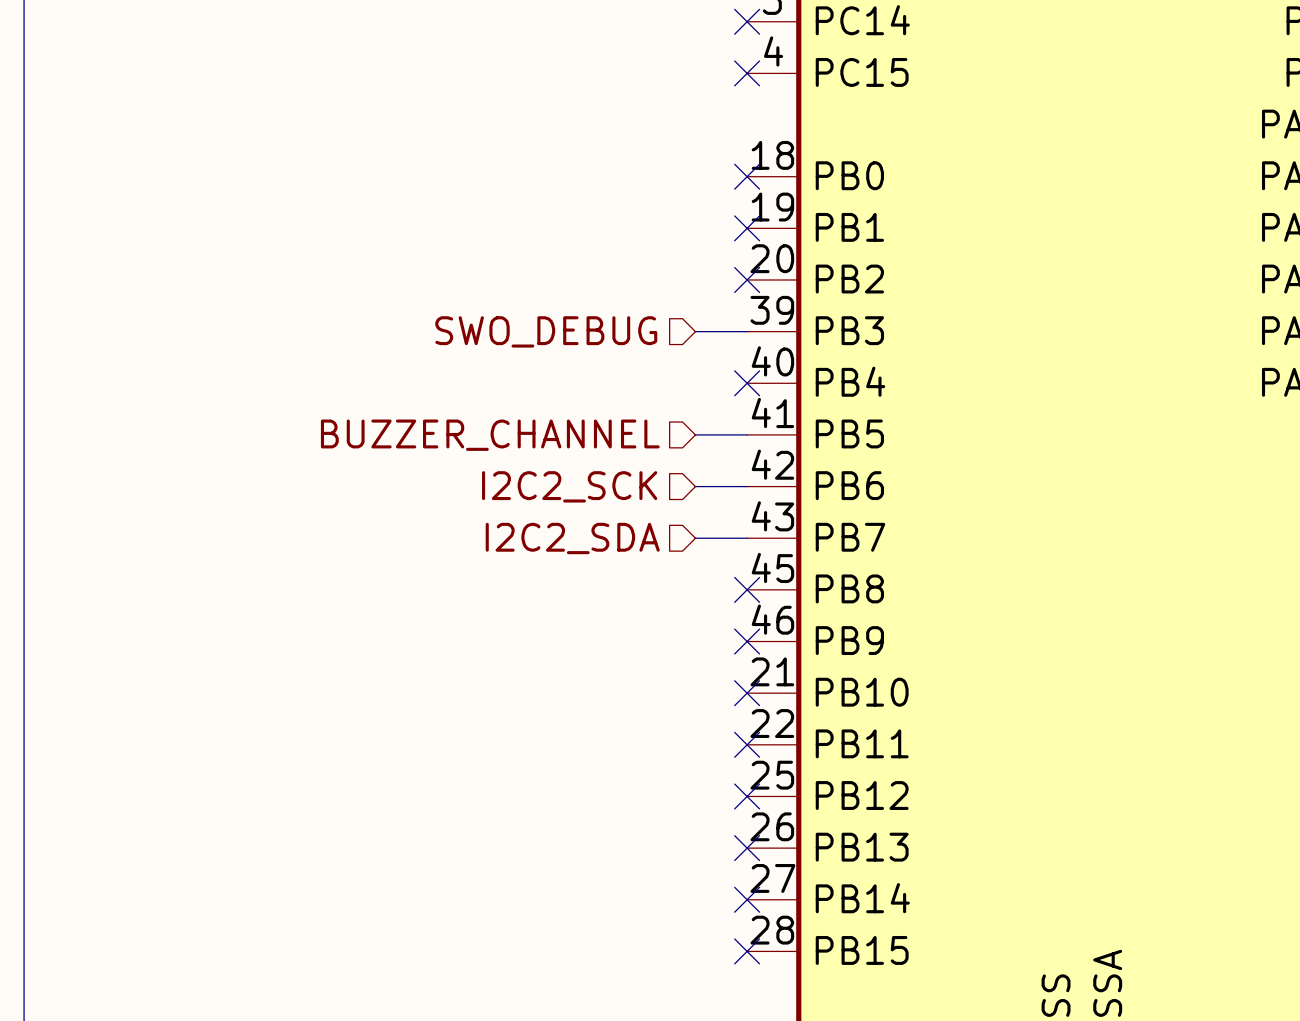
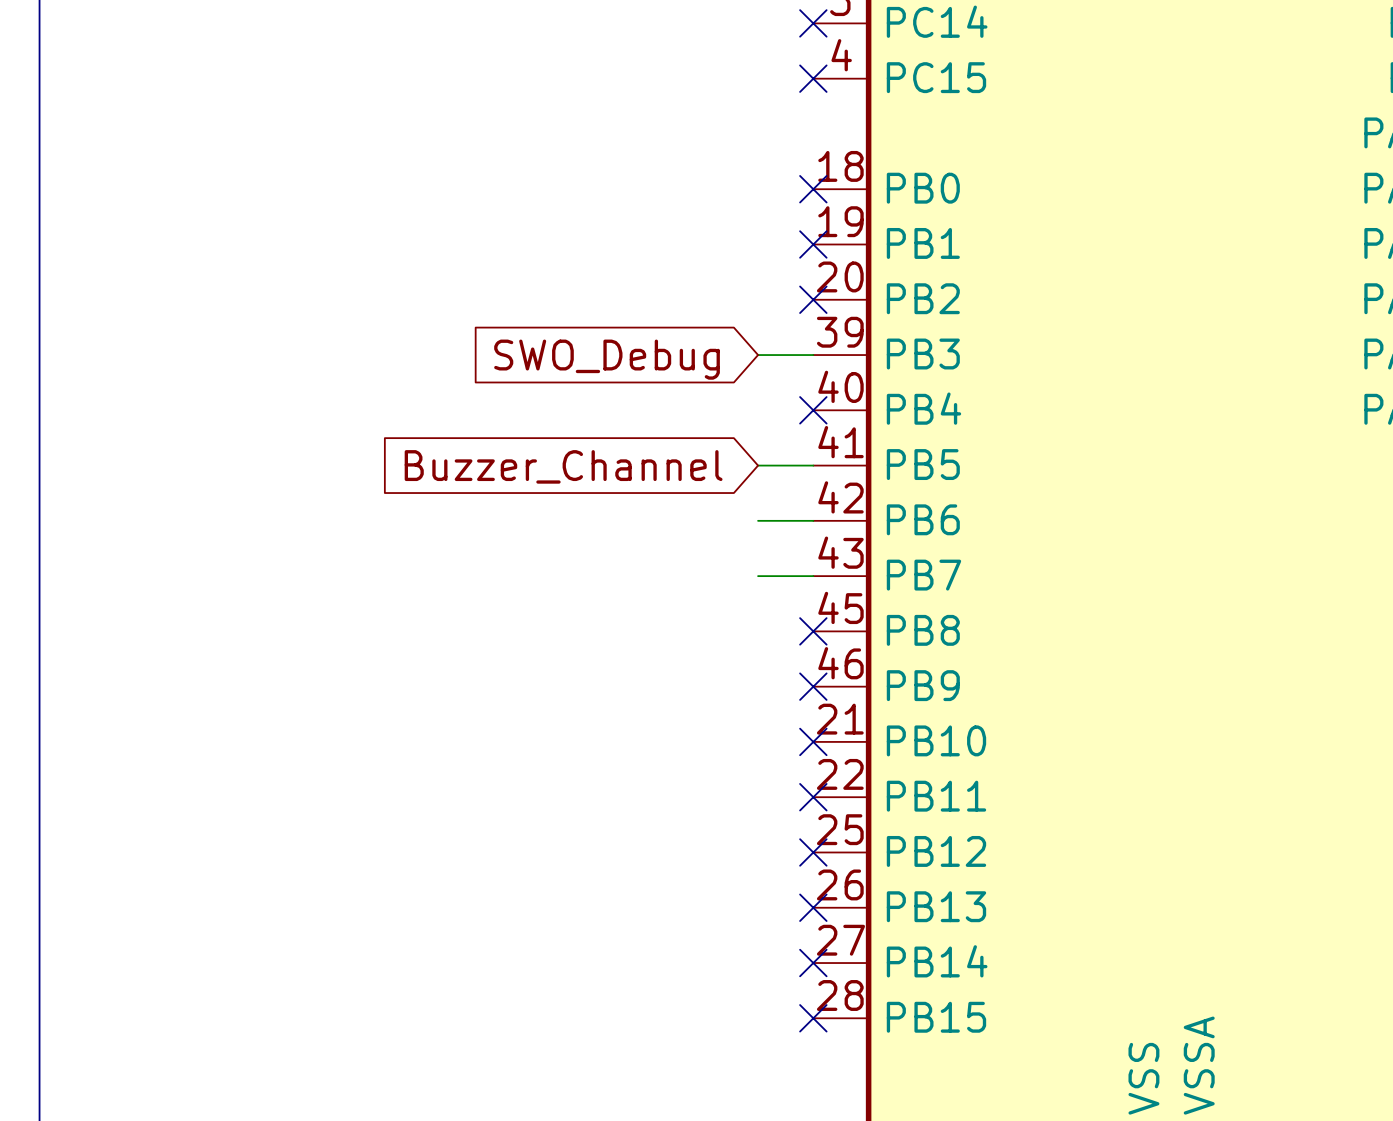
hierarchical label: SWO_DEBUG (546, 331) -> none
global label: none -> SWO_Debug (607, 359)
hierarchical label: BUZZER_CHANNEL (490, 435) -> none
global label: none -> Buzzer_Channel (563, 466)
hierarchical label: I2C2_SCK (569, 486) -> none
hierarchical label: I2C2_SDA (572, 538) -> none

